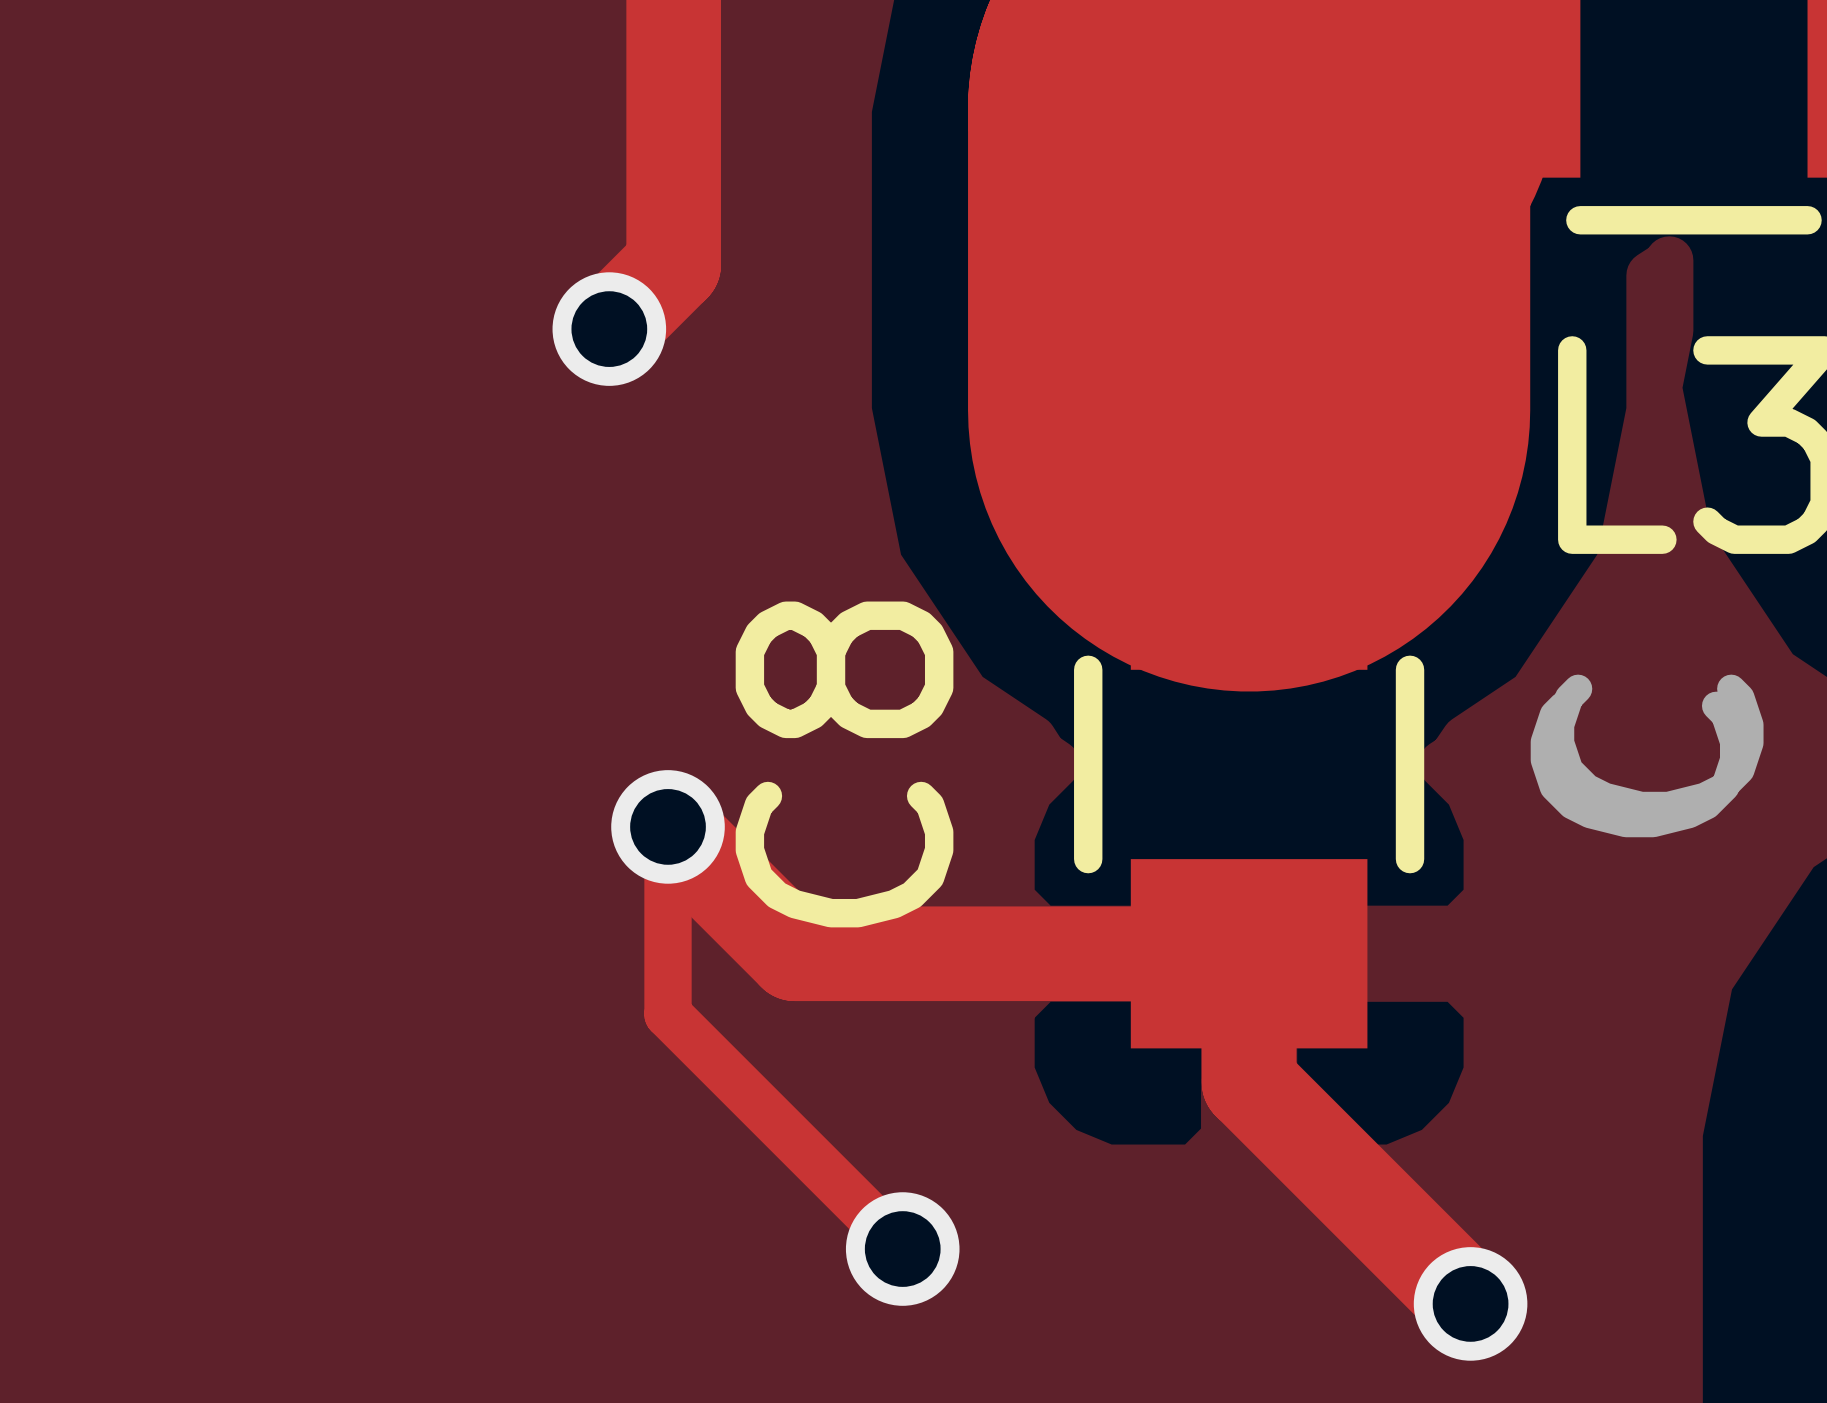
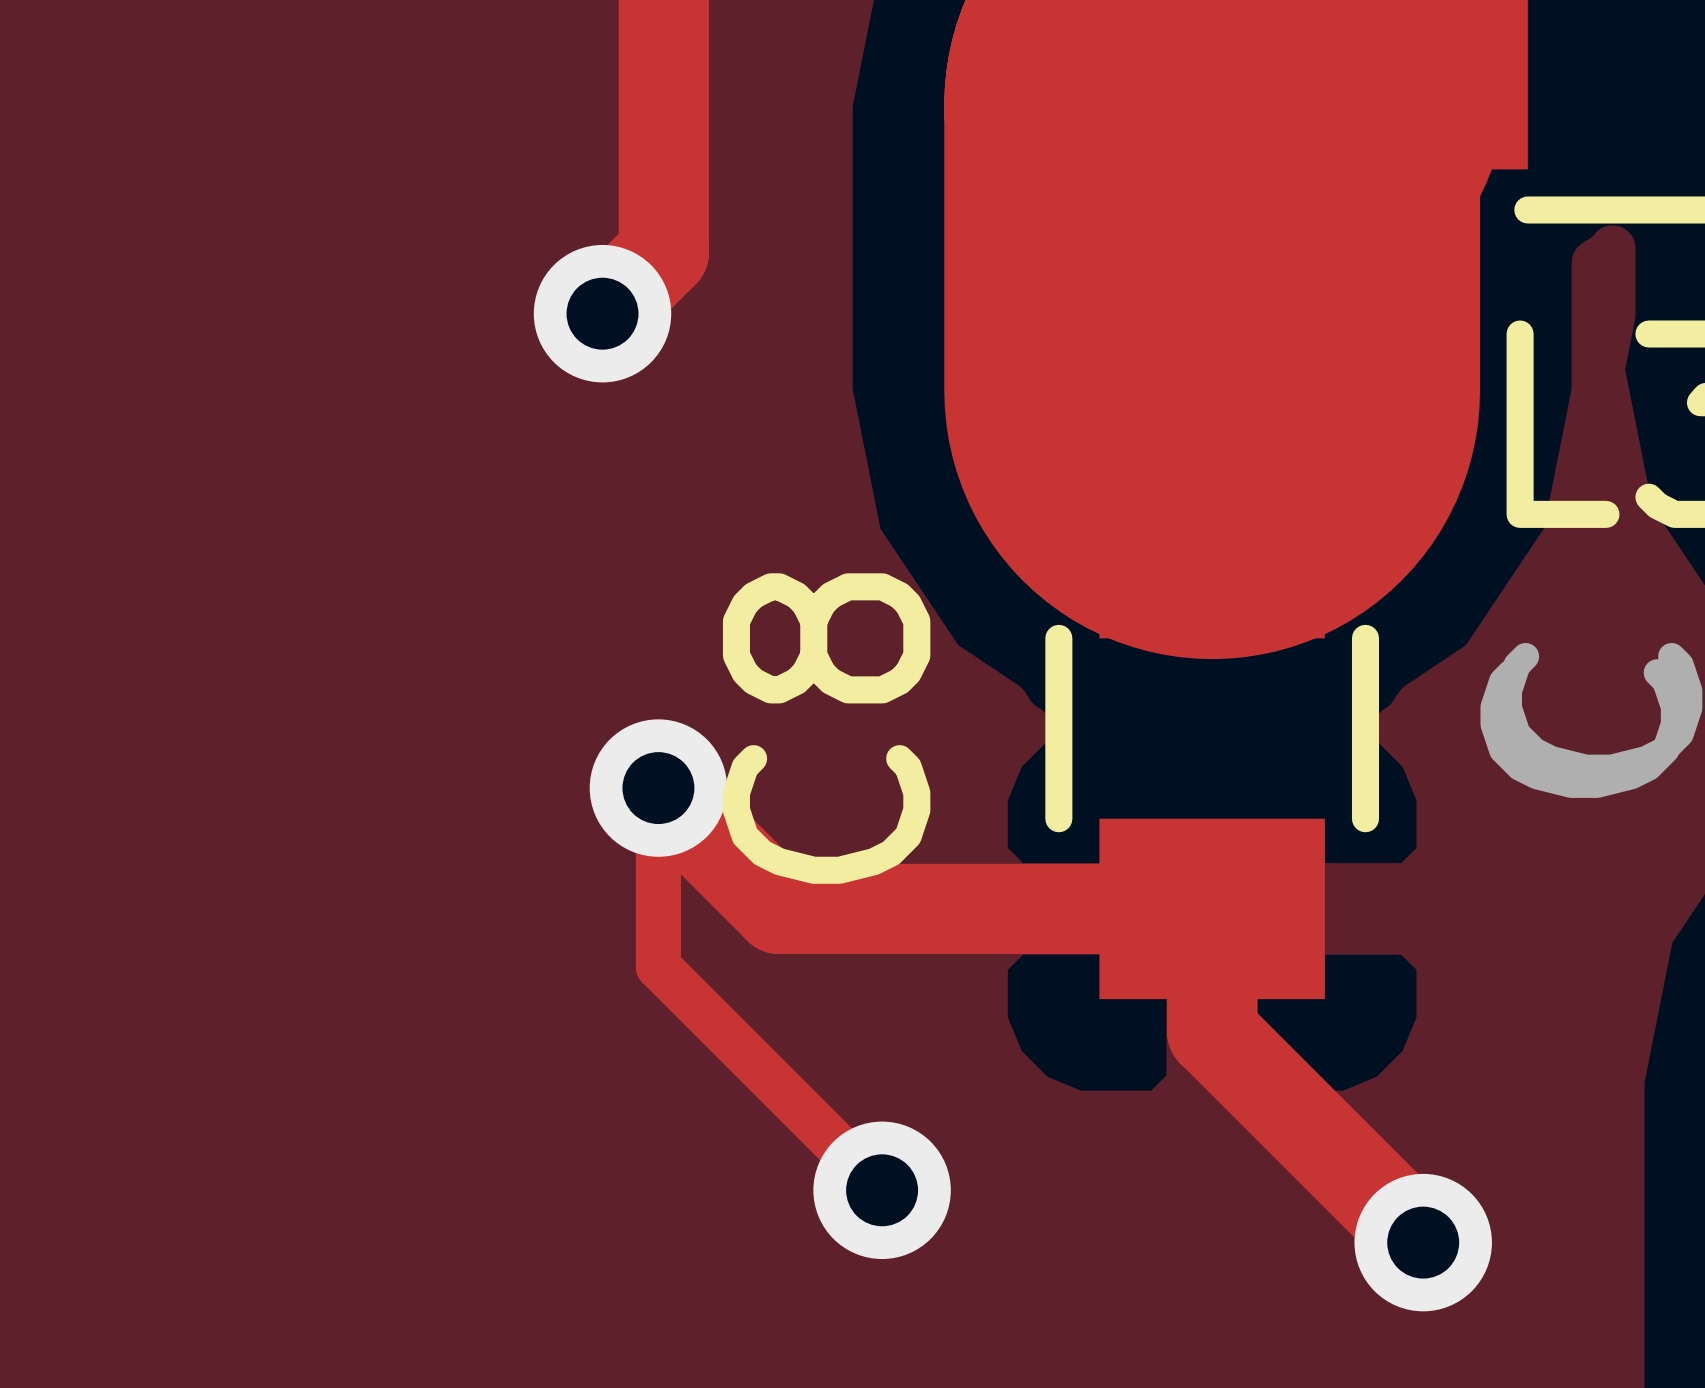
via size: [552, 272, 667, 386] -> [533, 244, 672, 383]
via size: [611, 770, 725, 884] -> [589, 719, 728, 857]
via size: [845, 1192, 960, 1306] -> [813, 1121, 951, 1260]
via size: [1413, 1247, 1528, 1361] -> [1354, 1173, 1492, 1312]

